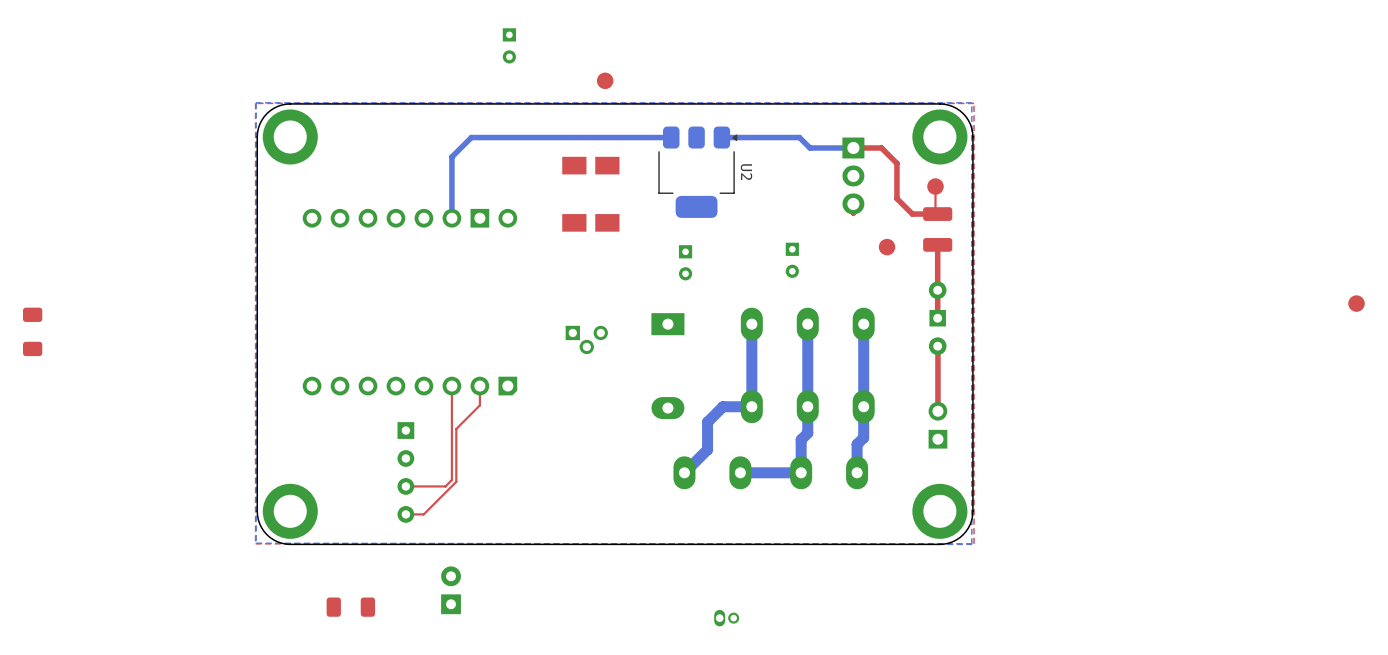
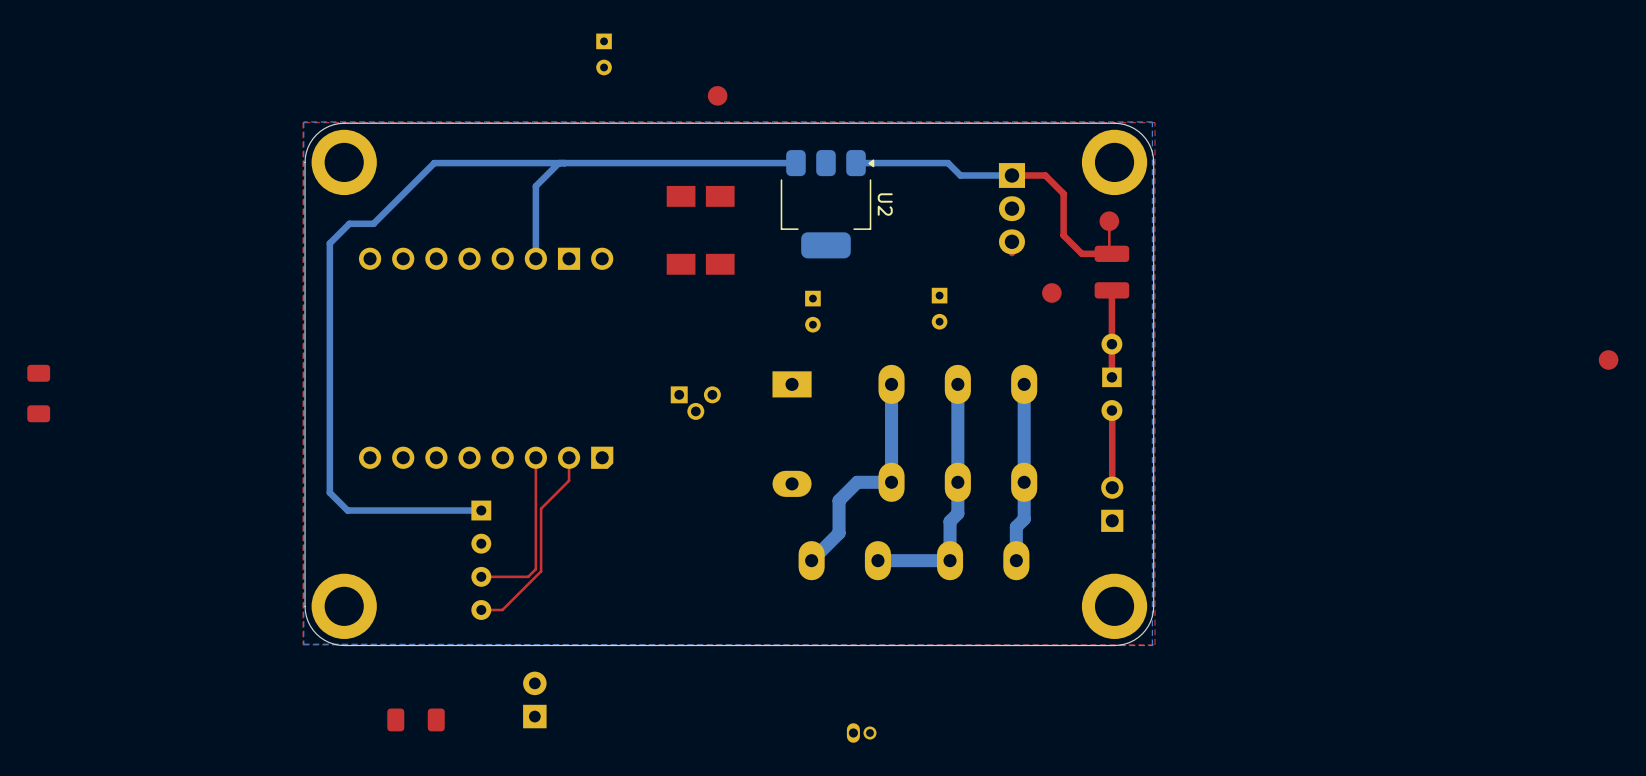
bottom track: none -> (558, 163) (434, 163) (373, 223) (349, 223) (329, 243) (329, 492) (347, 510) (481, 510)

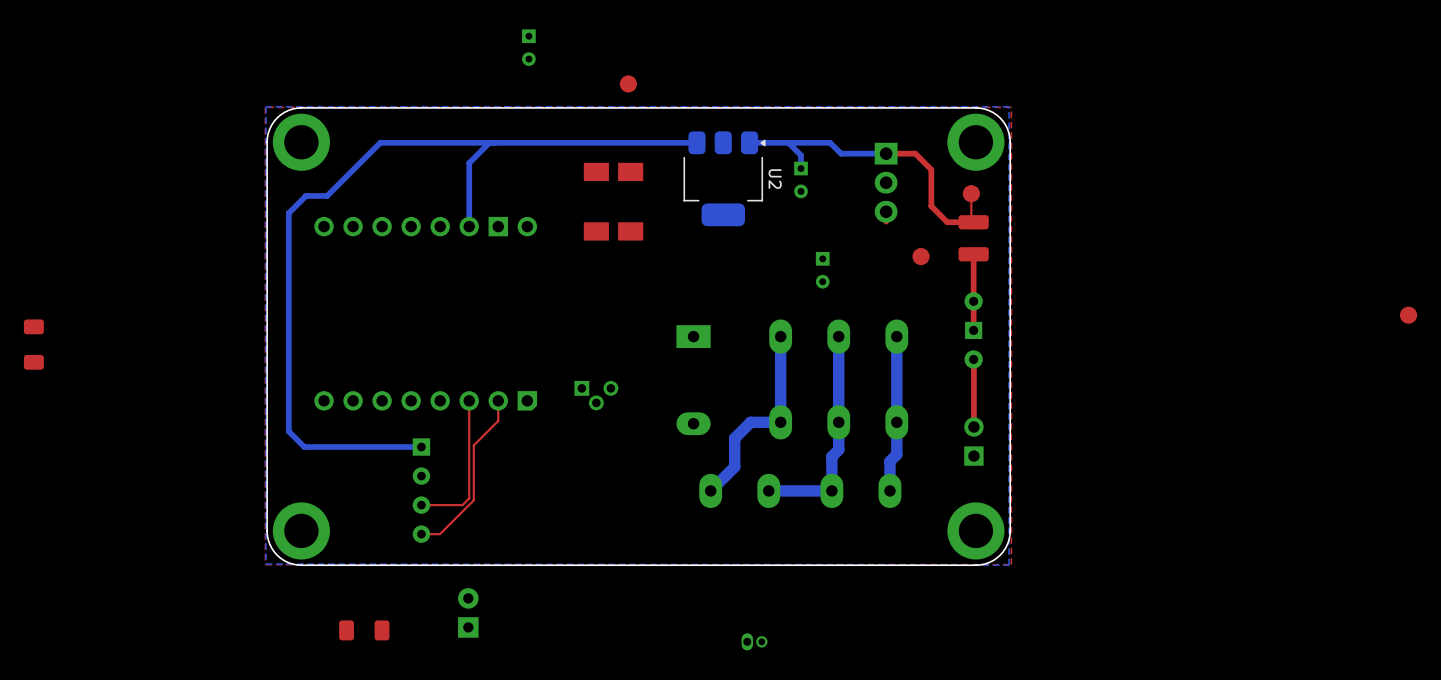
bottom track: none -> (788, 142) (801, 155) (801, 168)
part position: (812, 311) -> (801, 179)
part position: (695, 403) -> (596, 395)

